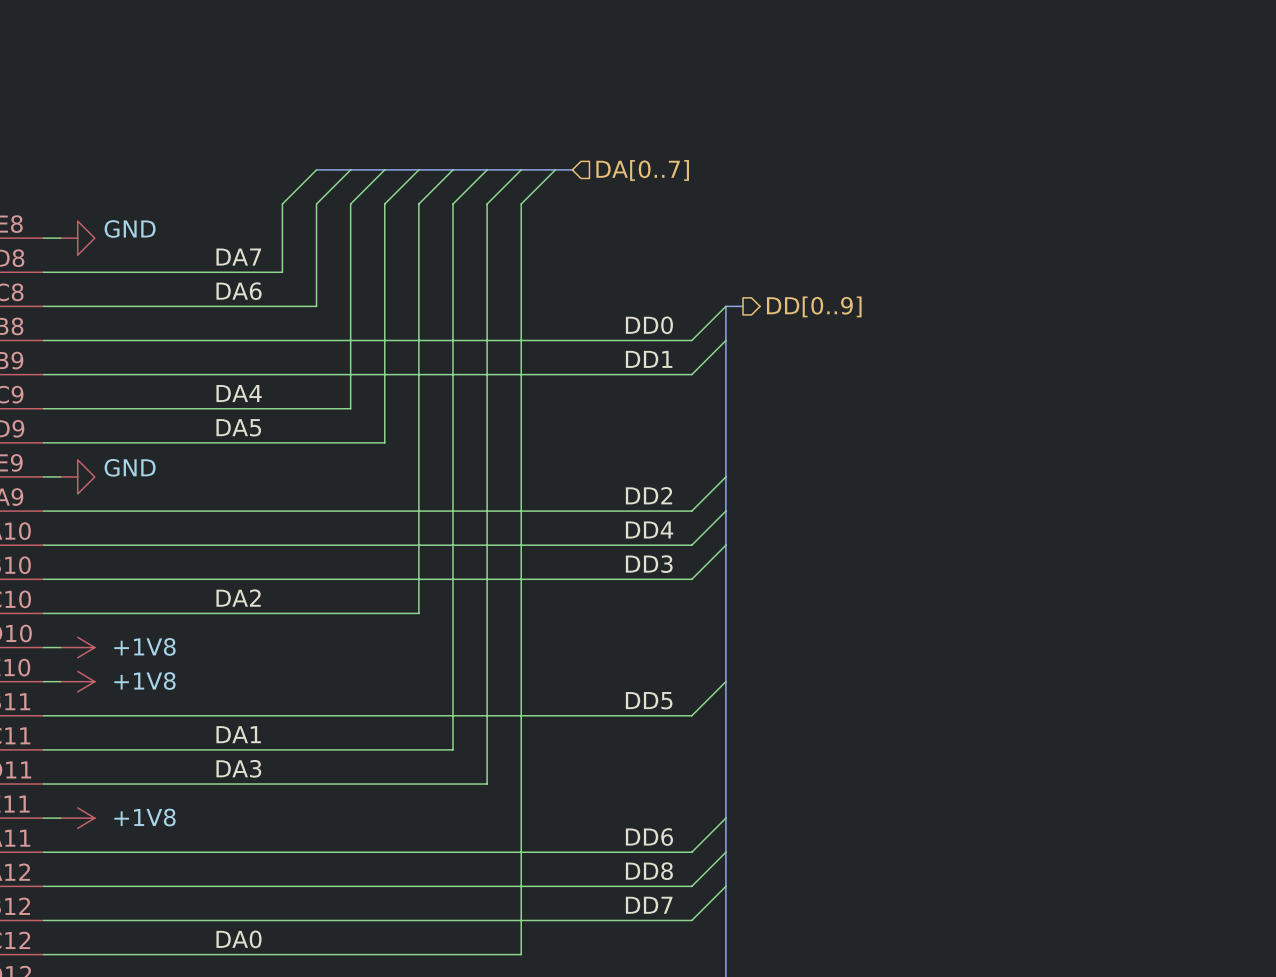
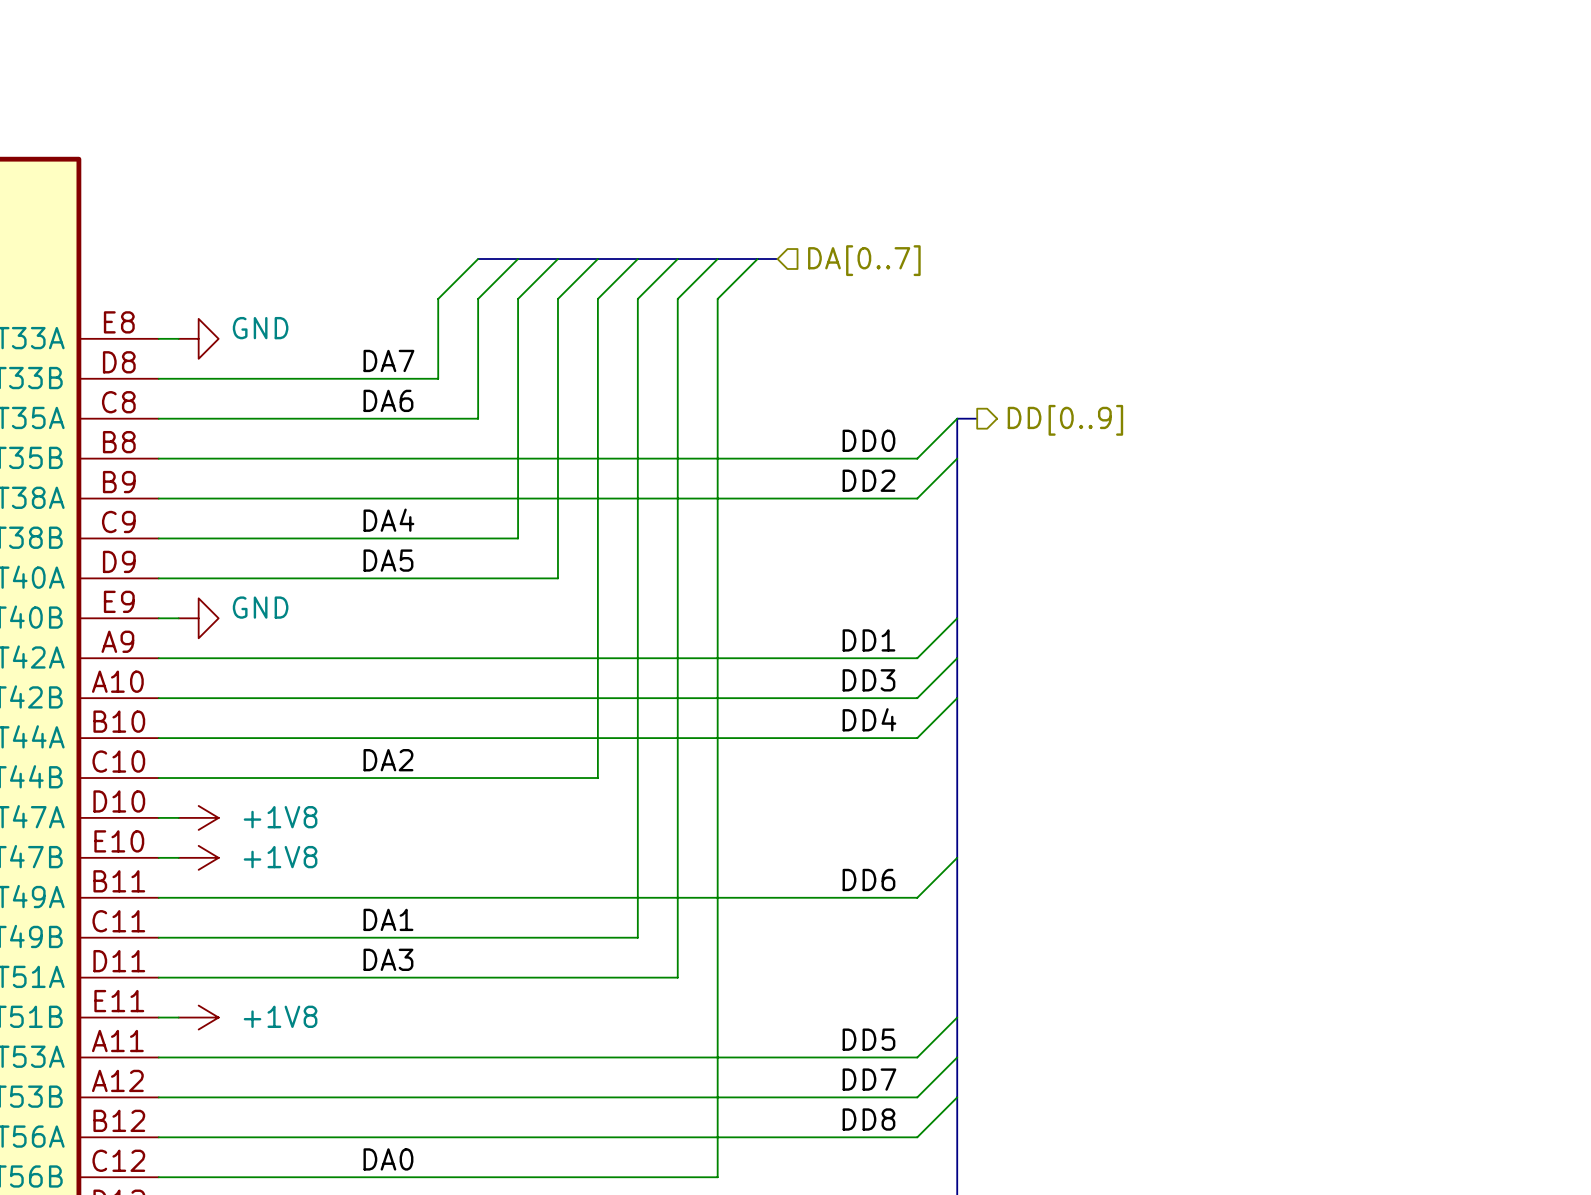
label: DD1 (649, 359) -> DD2 (868, 480)
label: DD2 (649, 495) -> DD1 (868, 640)
label: DD4 (649, 529) -> DD3 (868, 680)
label: DD3 (649, 564) -> DD4 (869, 719)
label: DD5 (649, 700) -> DD6 (868, 879)
label: DD6 (649, 837) -> DD5 (868, 1039)
label: DD8 (649, 871) -> DD7 (869, 1079)
label: DD7 (649, 905) -> DD8 (868, 1119)

